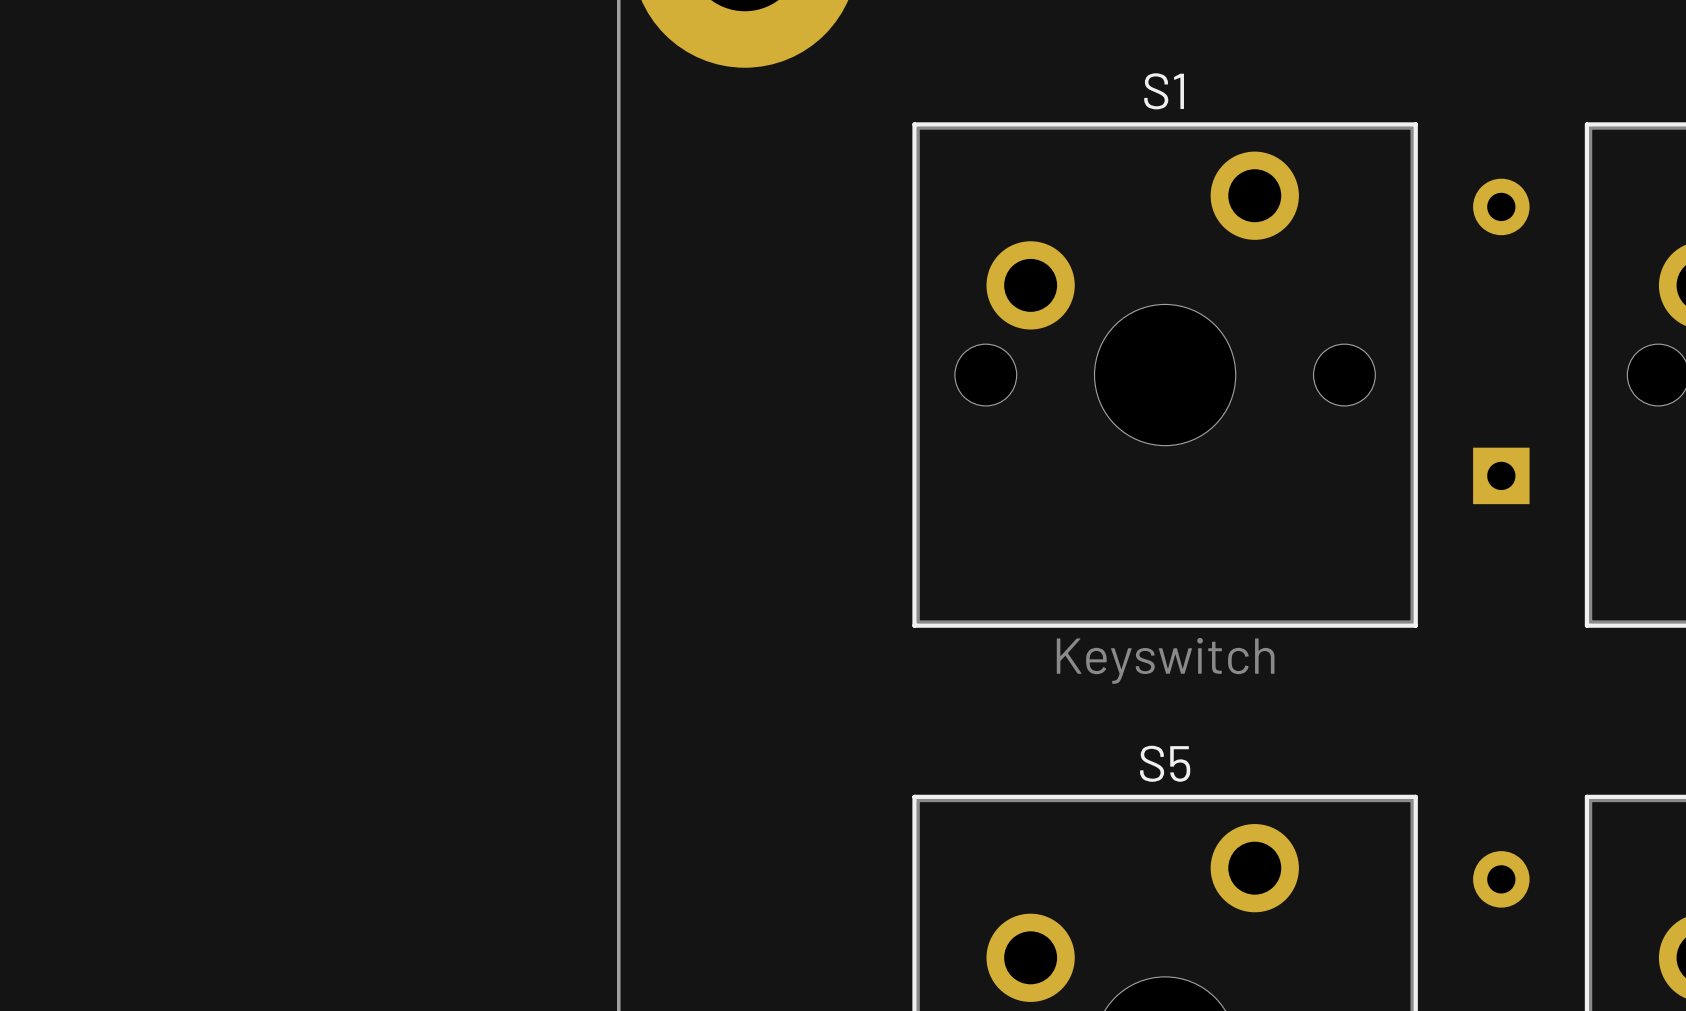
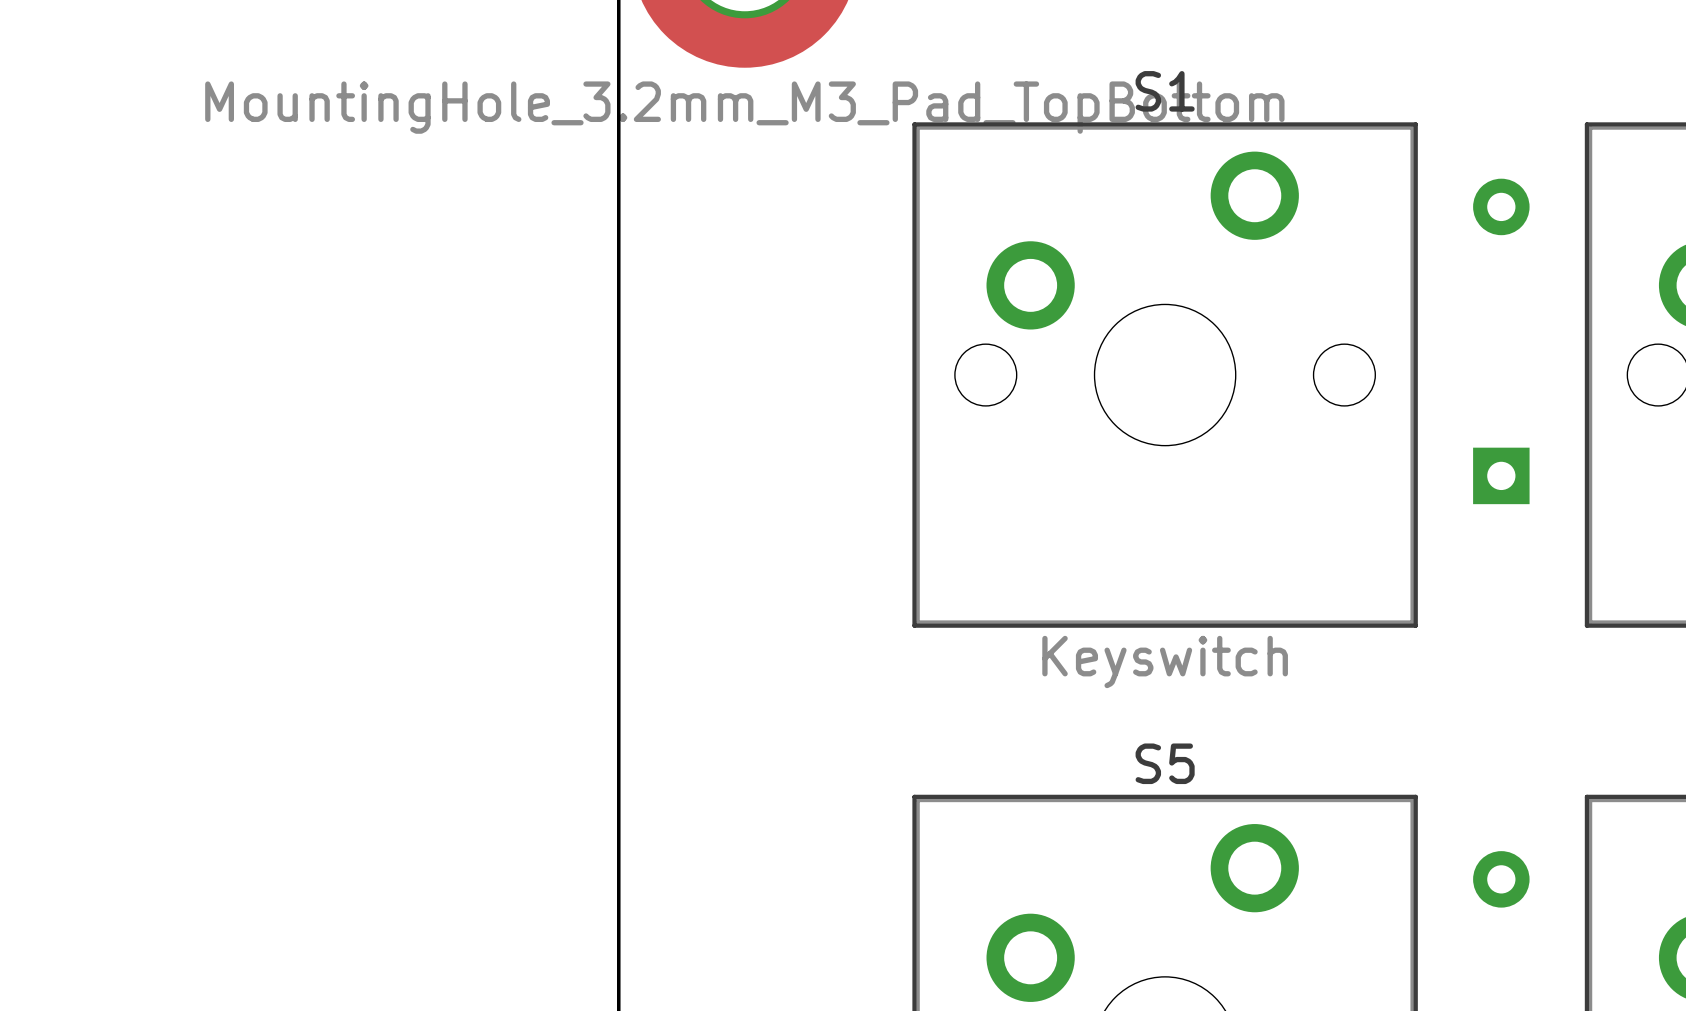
part value: none -> MountingHole_3.2mm_M3_Pad_TopBottom (744, 107)

